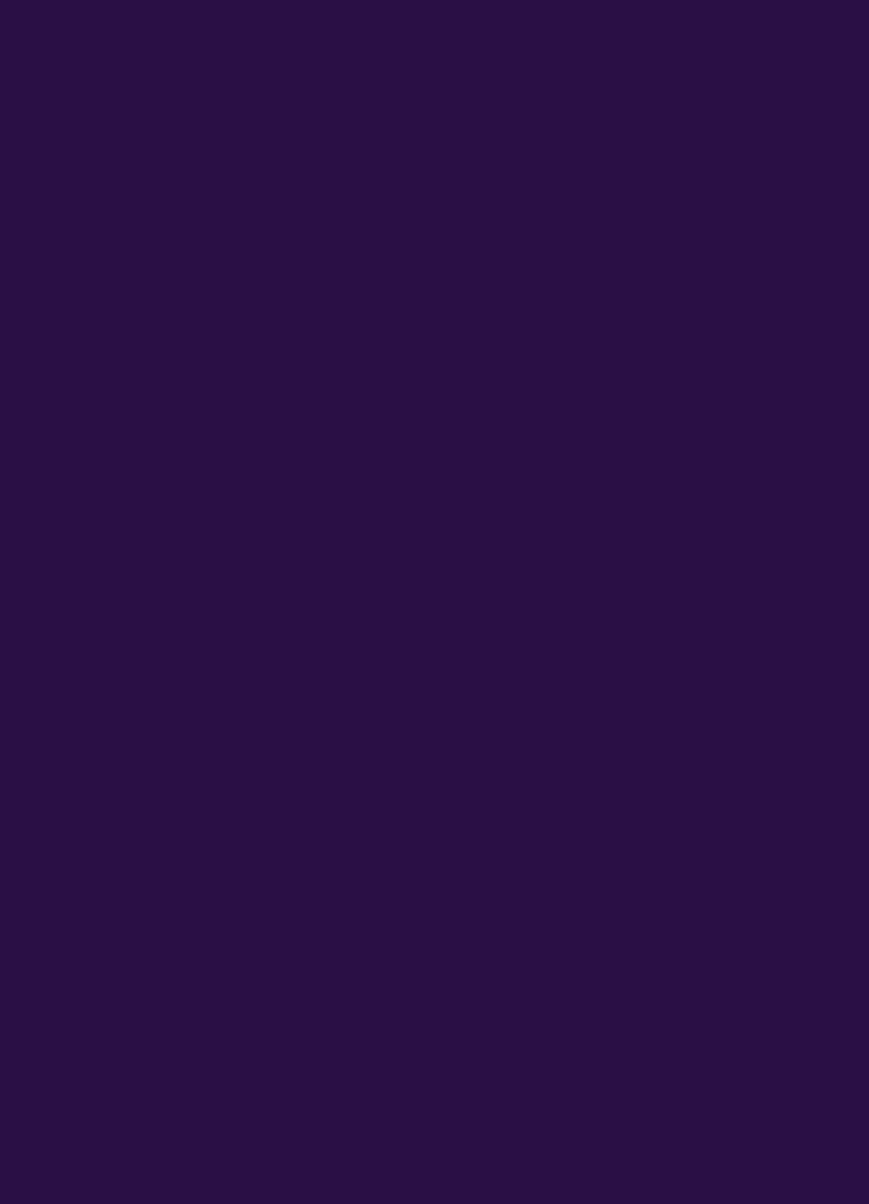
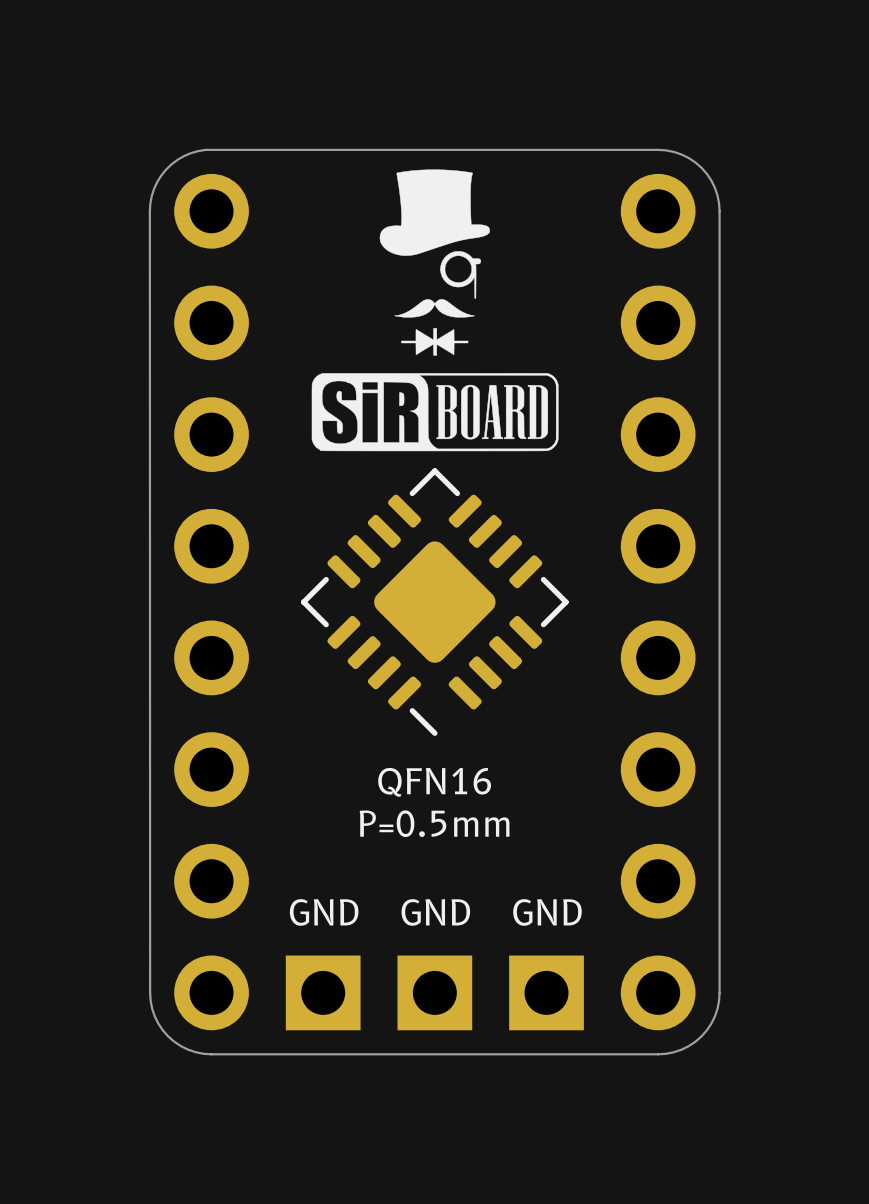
board edge: none -> (205, 149) (658, 149) (674, 151) (688, 158) (701, 167) (711, 180) (717, 195) (719, 211) (719, 992) (717, 1008) (711, 1023) (701, 1036) (688, 1046) (674, 1052) (658, 1054) (211, 1054) (195, 1052) (180, 1046) (168, 1036) (158, 1023) (152, 1008) (150, 992) (149, 211) (154, 188) (166, 169) (184, 156) (205, 149)
drawing: none -> [311, 169, 559, 452]
part: none -> (211, 602)
part: none -> (434, 602)
part: none -> (658, 602)
text: none -> QFN16 (434, 782)
text: none -> P=0.5mm (434, 823)
text: none -> GND (324, 912)
text: none -> GND (435, 912)
text: none -> GND (547, 912)
part: none -> (434, 992)

